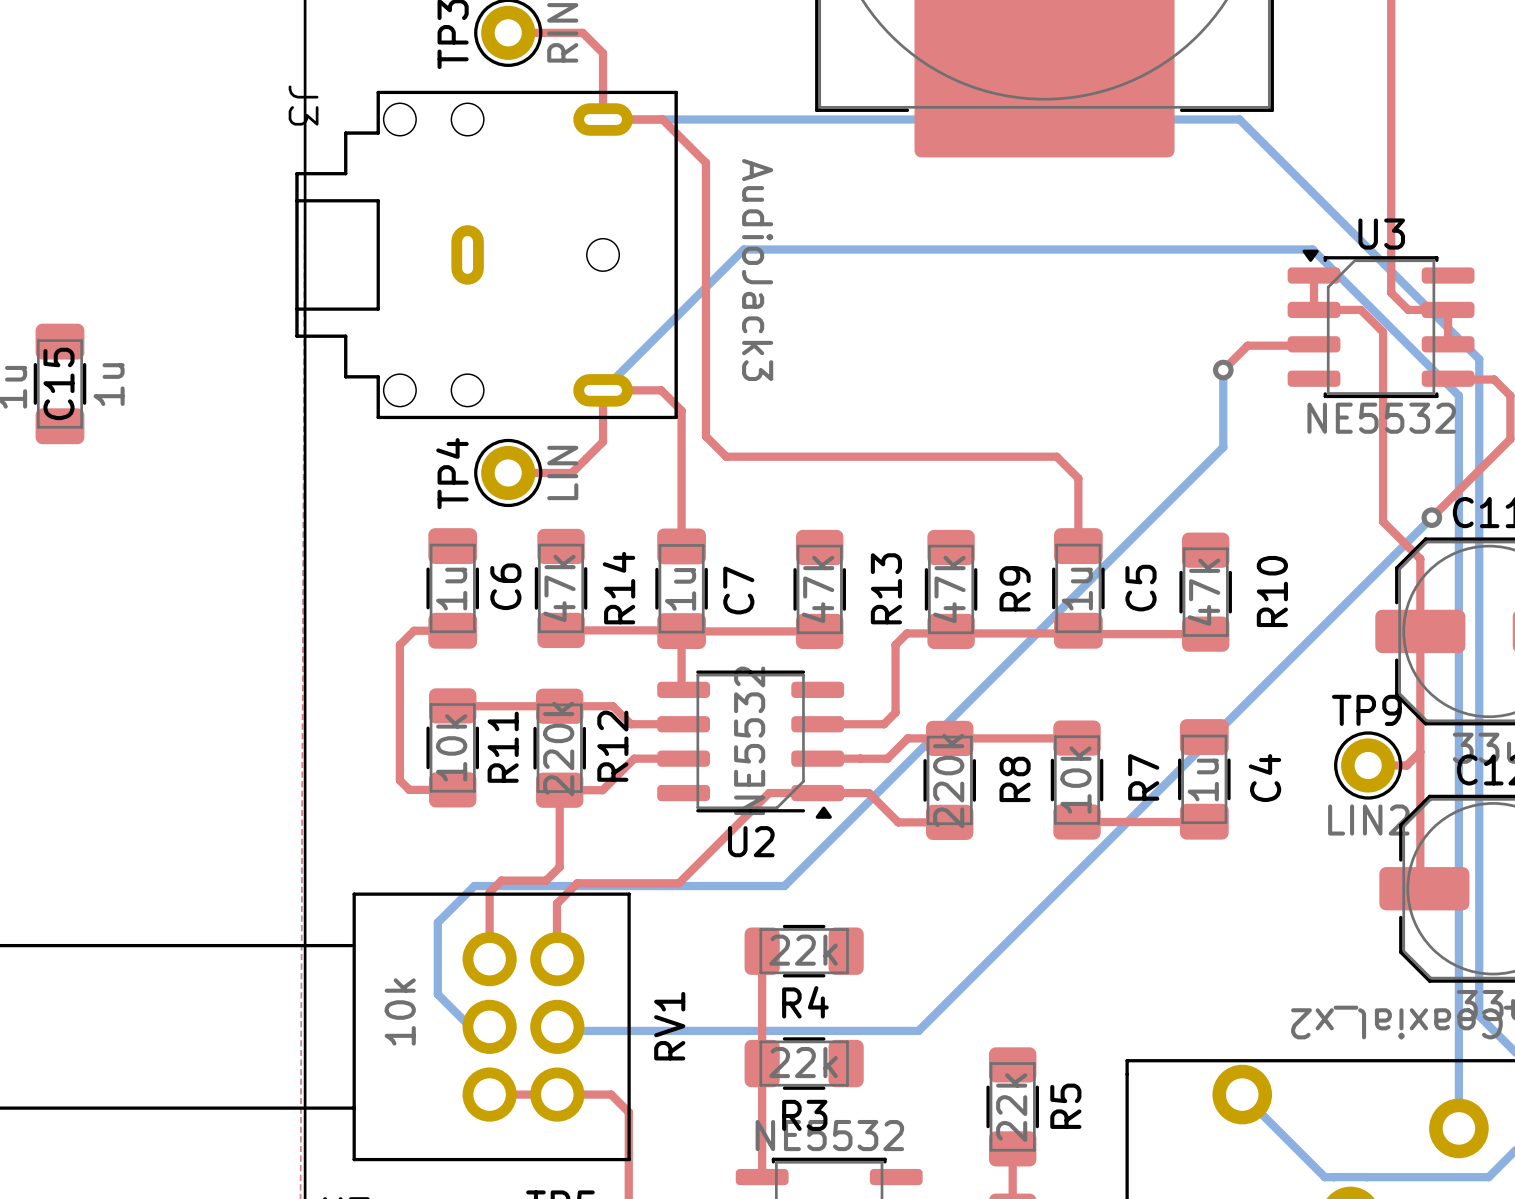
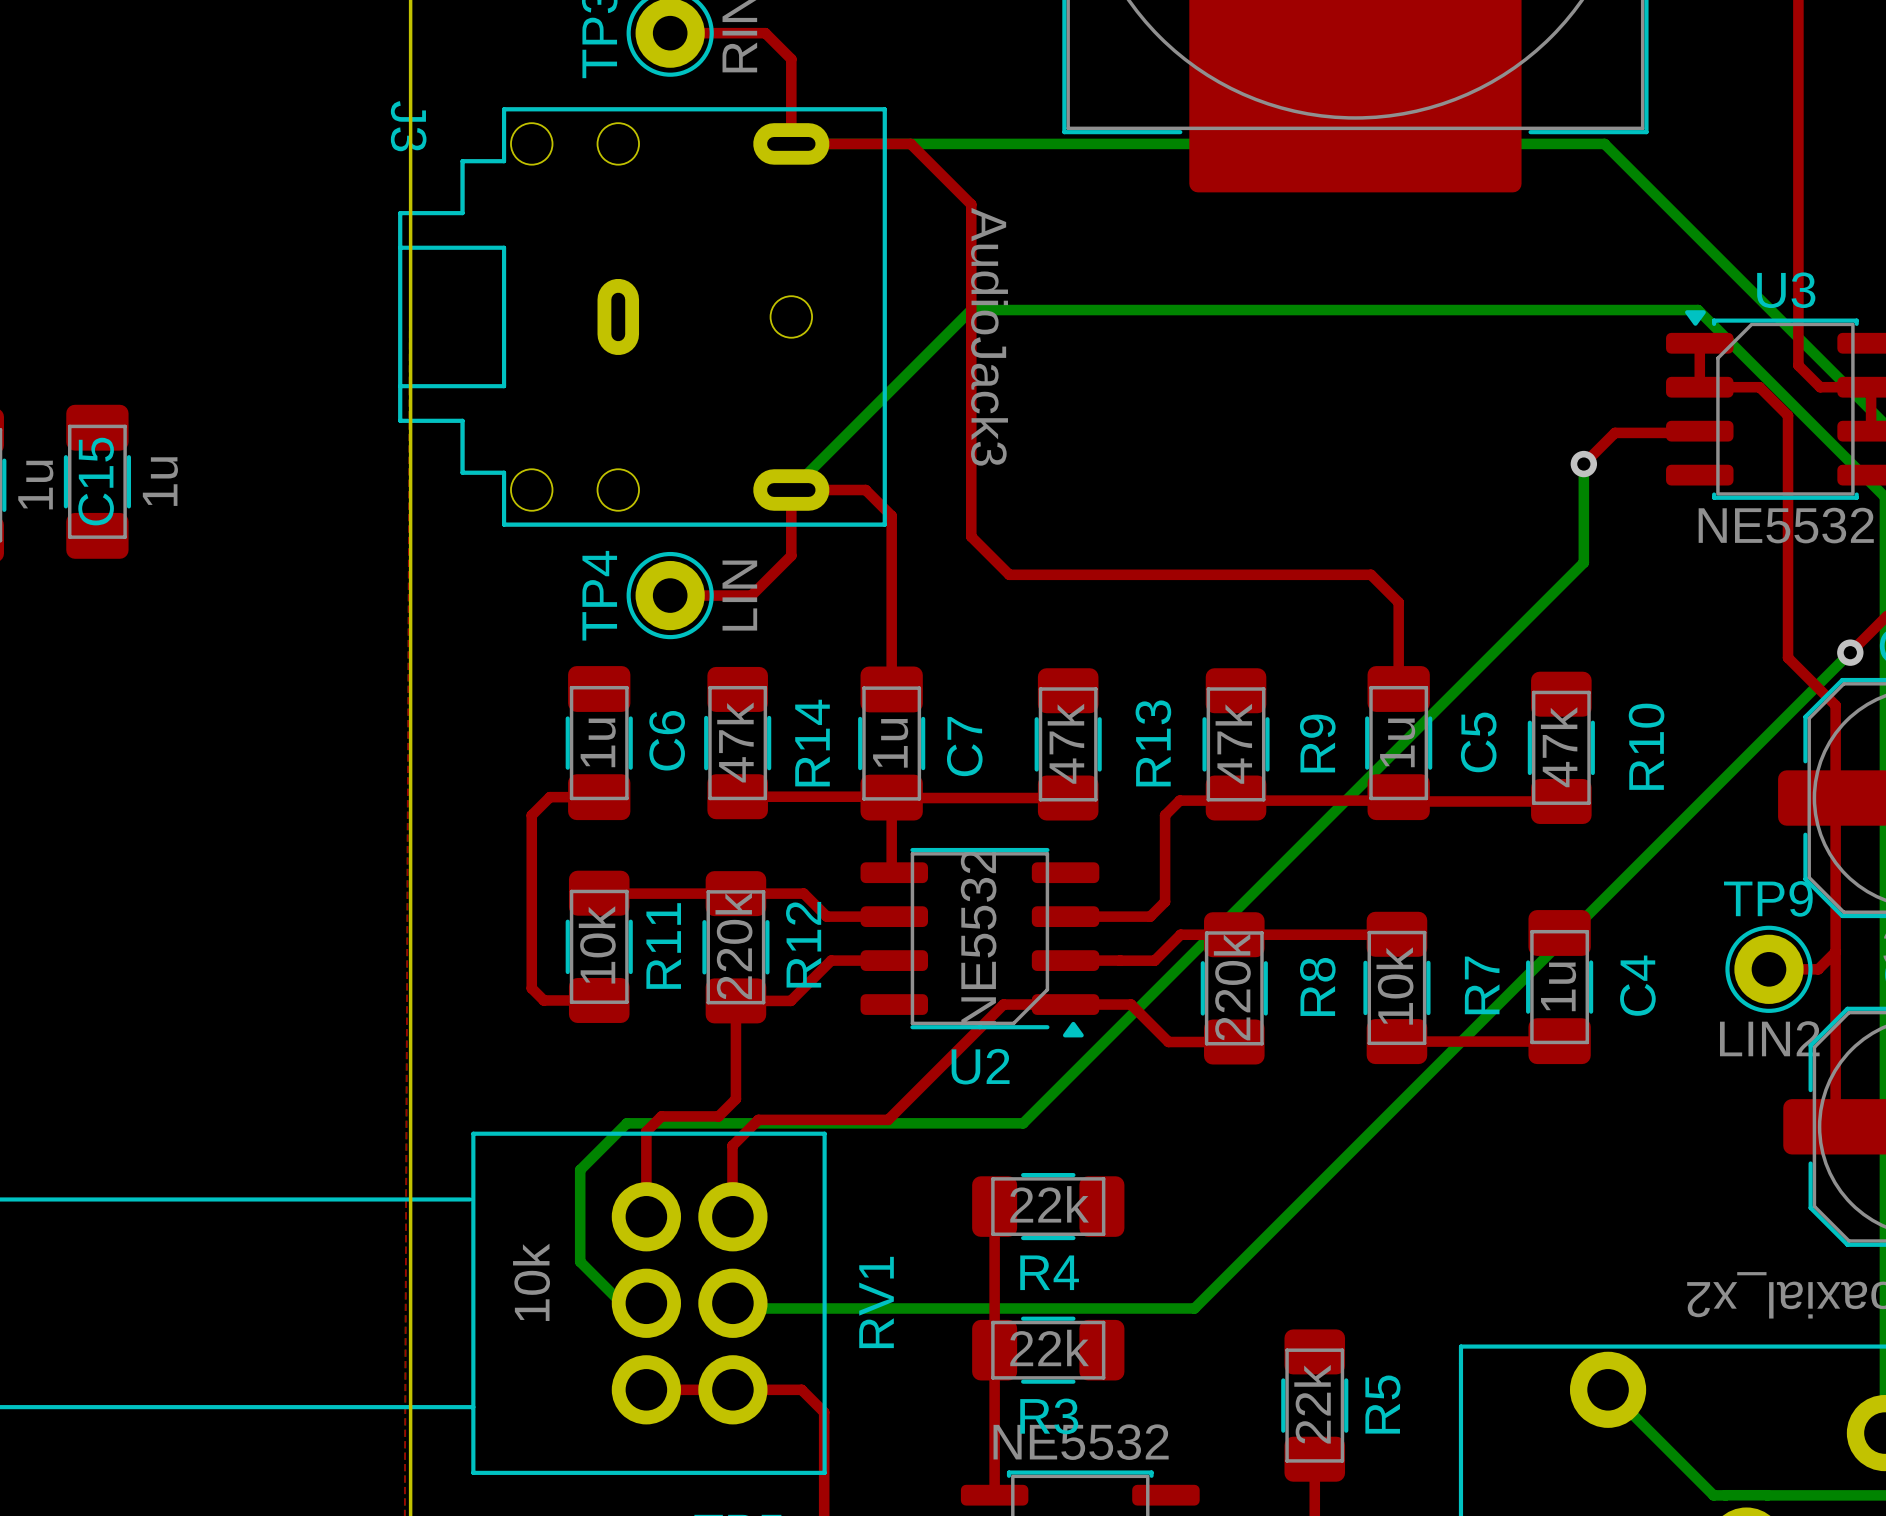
top track: (662, 119) (705, 162) (705, 436) (726, 456) (773, 456) -> (867, 143) (910, 143) (971, 204) (971, 536) (1009, 574)

